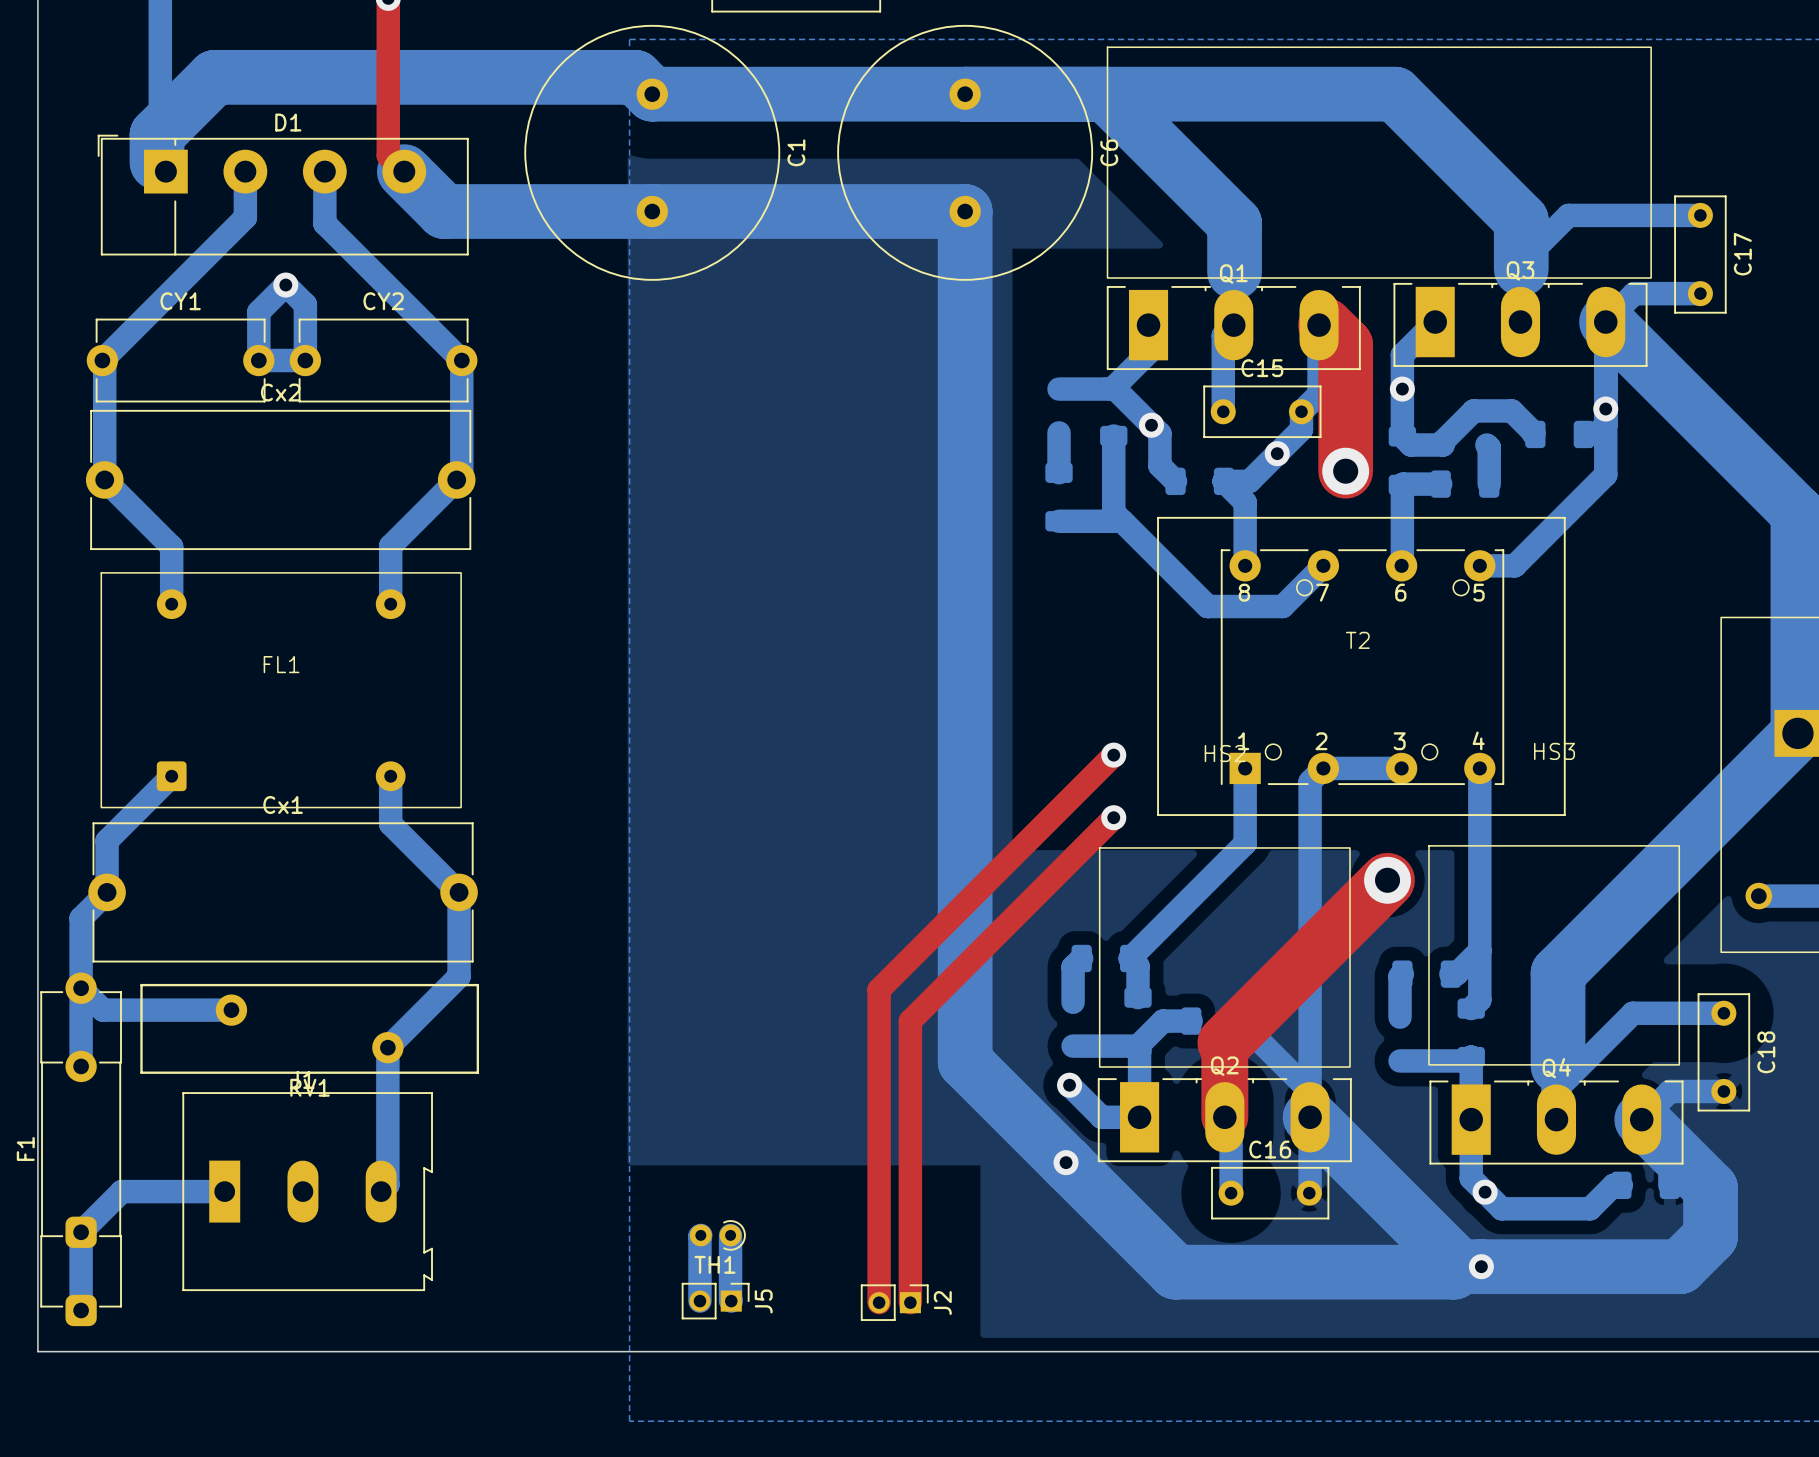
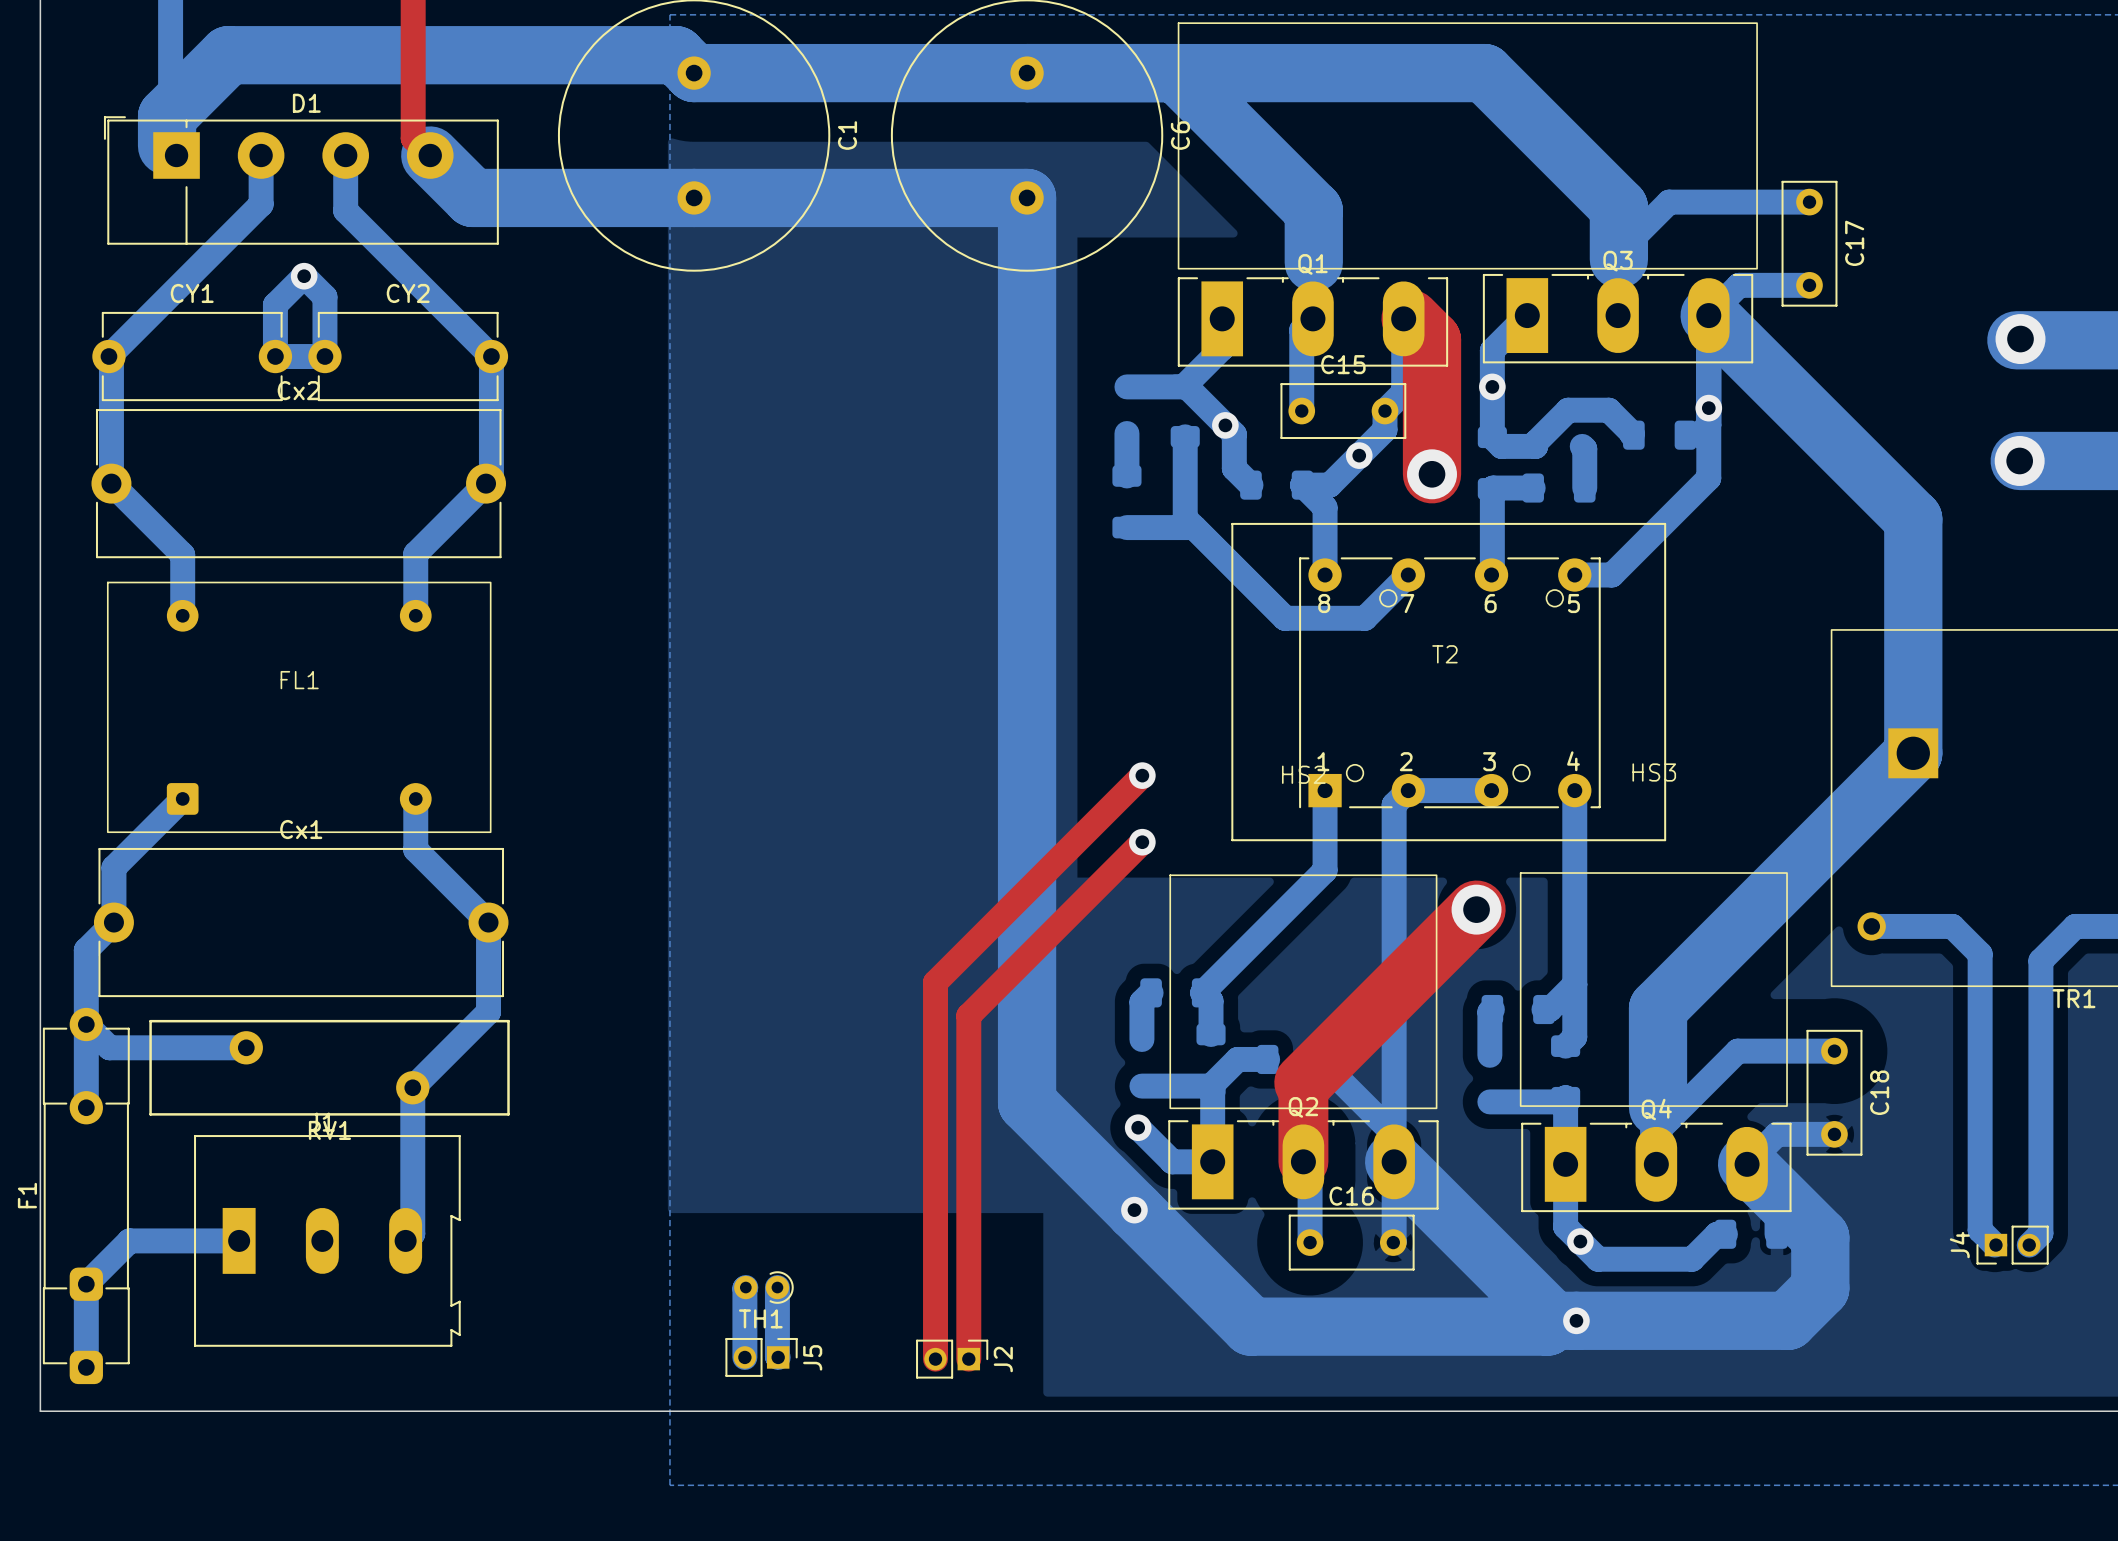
via: none -> (1142, 775)
top track: (1113, 755) (879, 989) -> (1142, 775) (935, 982) (935, 1026)
via: (1113, 755) -> none
via: none -> (1142, 842)
top track: (1113, 817) (910, 1021) -> (1142, 842) (968, 1015) (968, 1059)
via: (1113, 817) -> none

